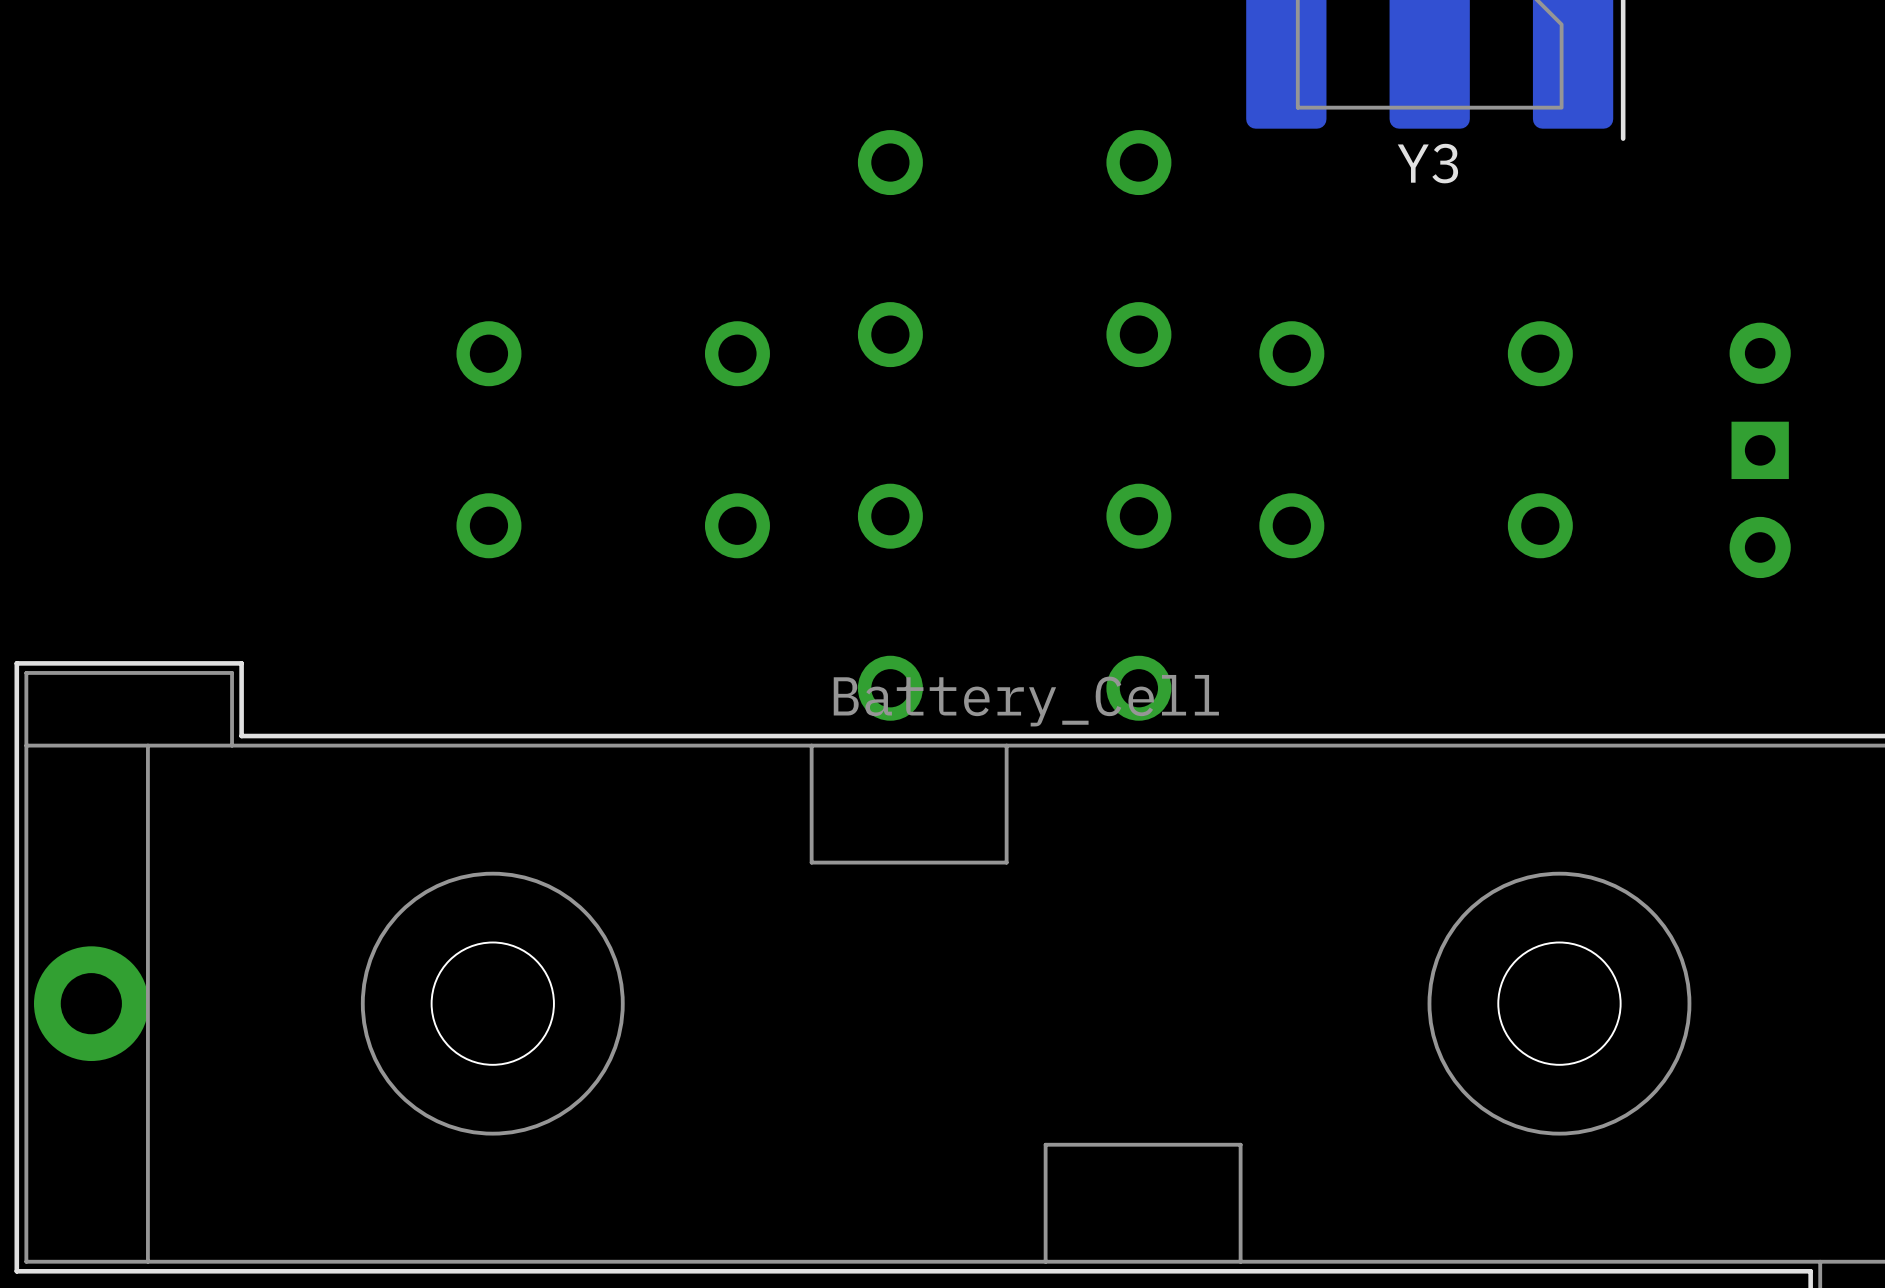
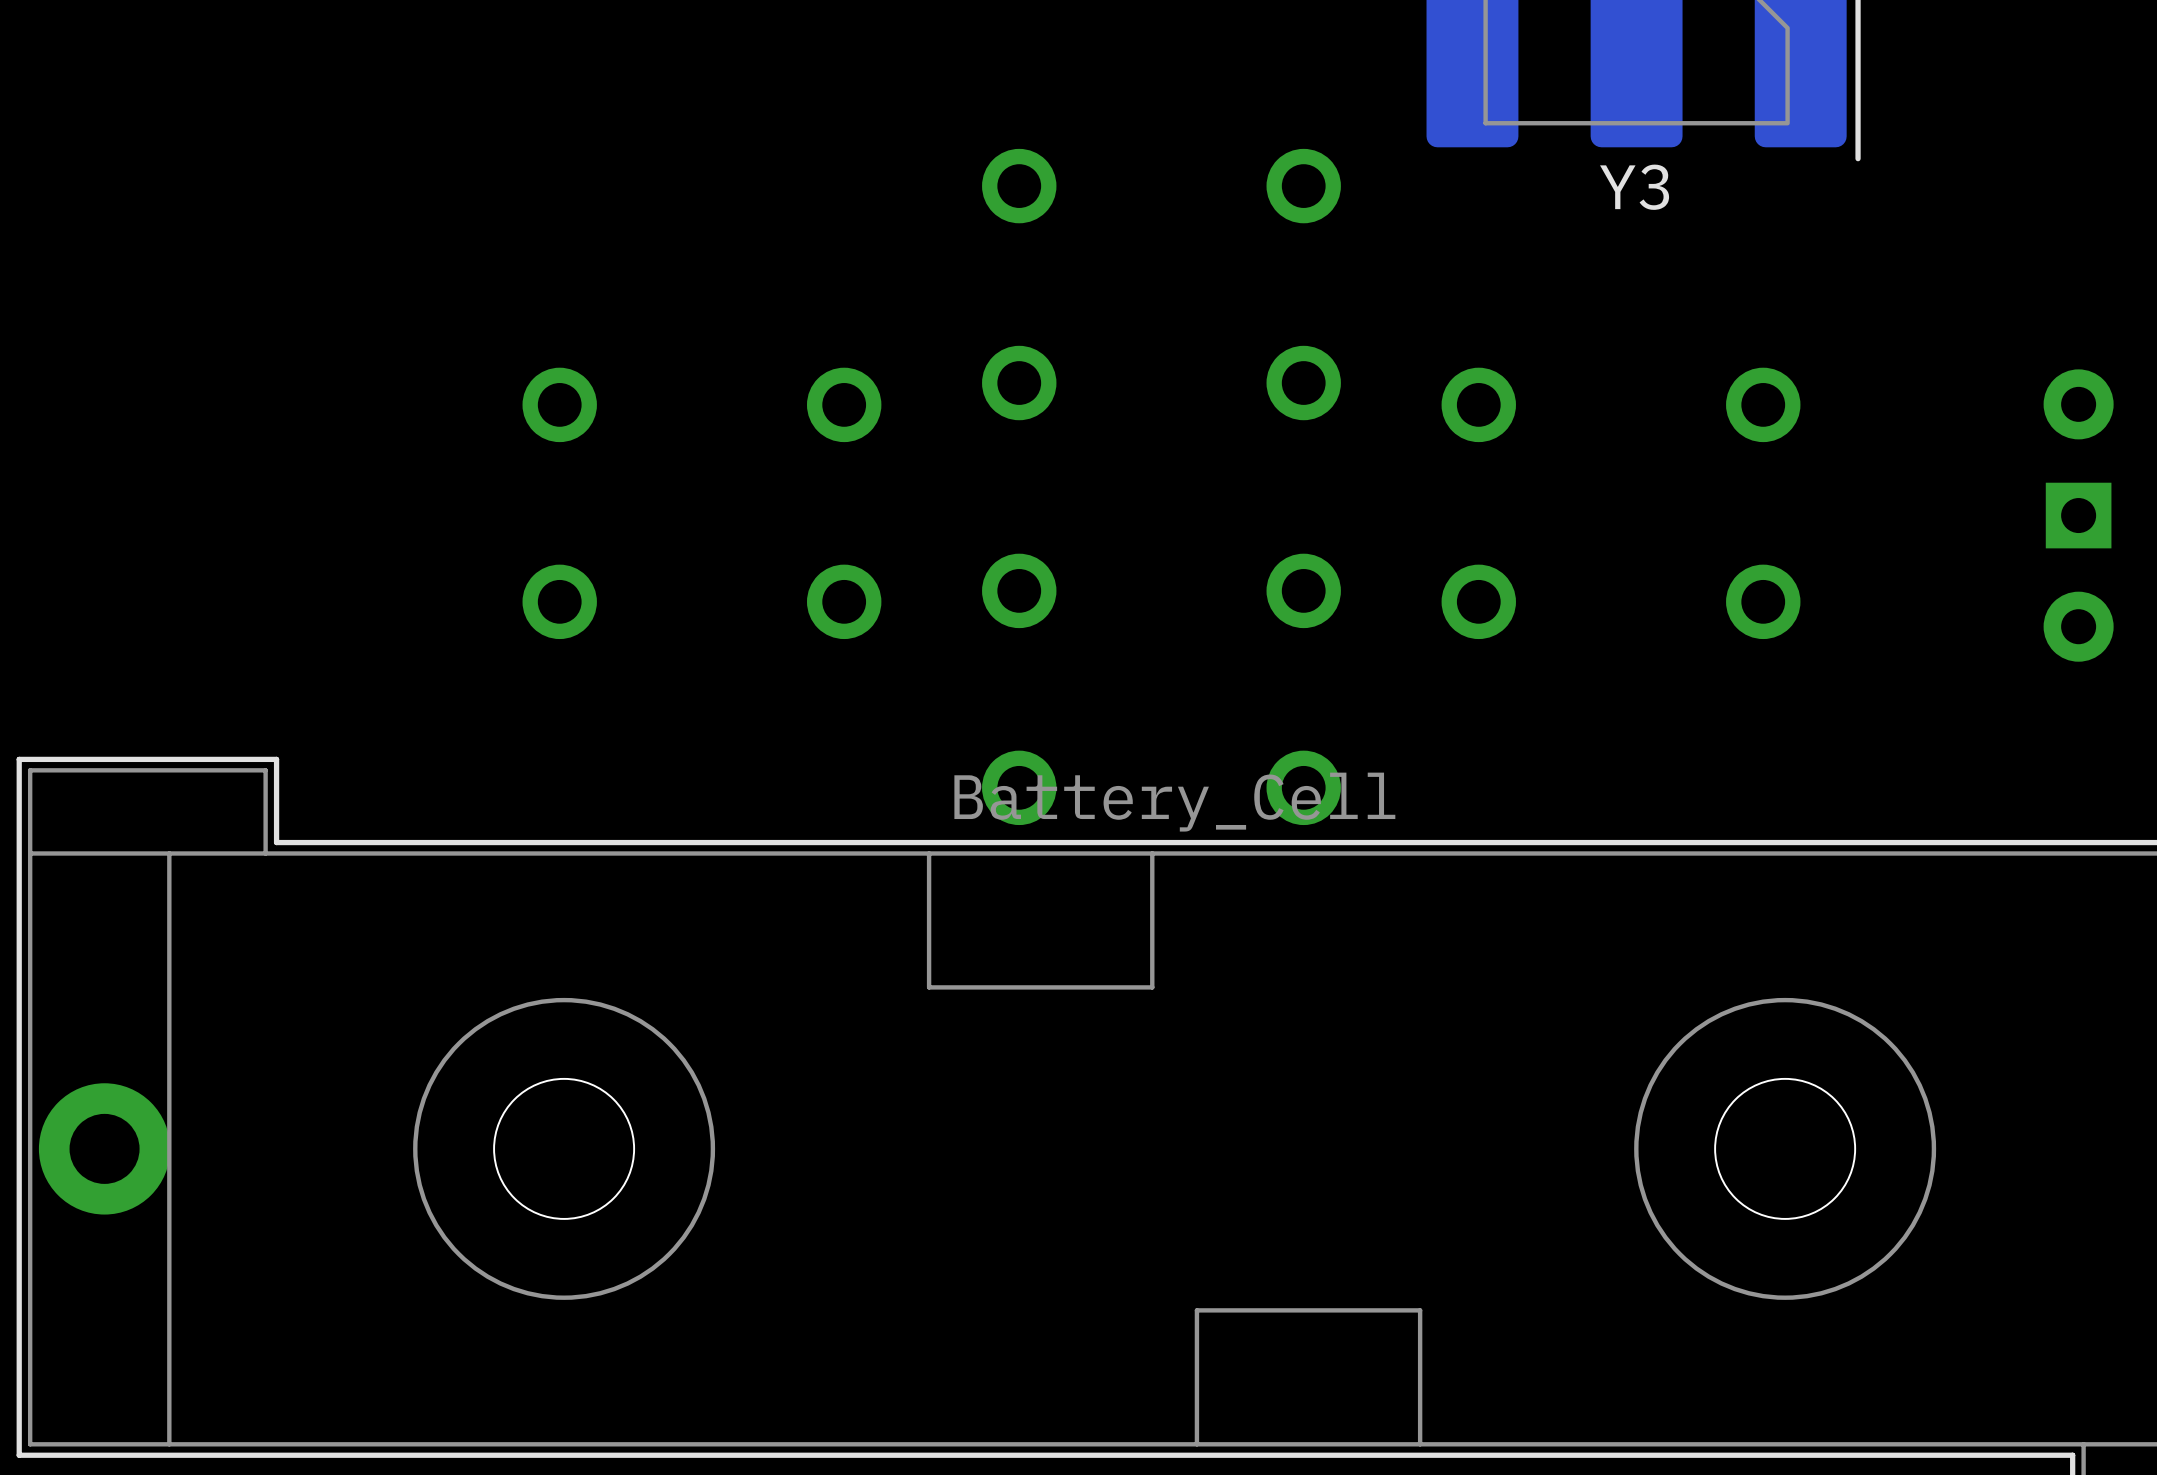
part position: (1760, 450) -> (2078, 515)

